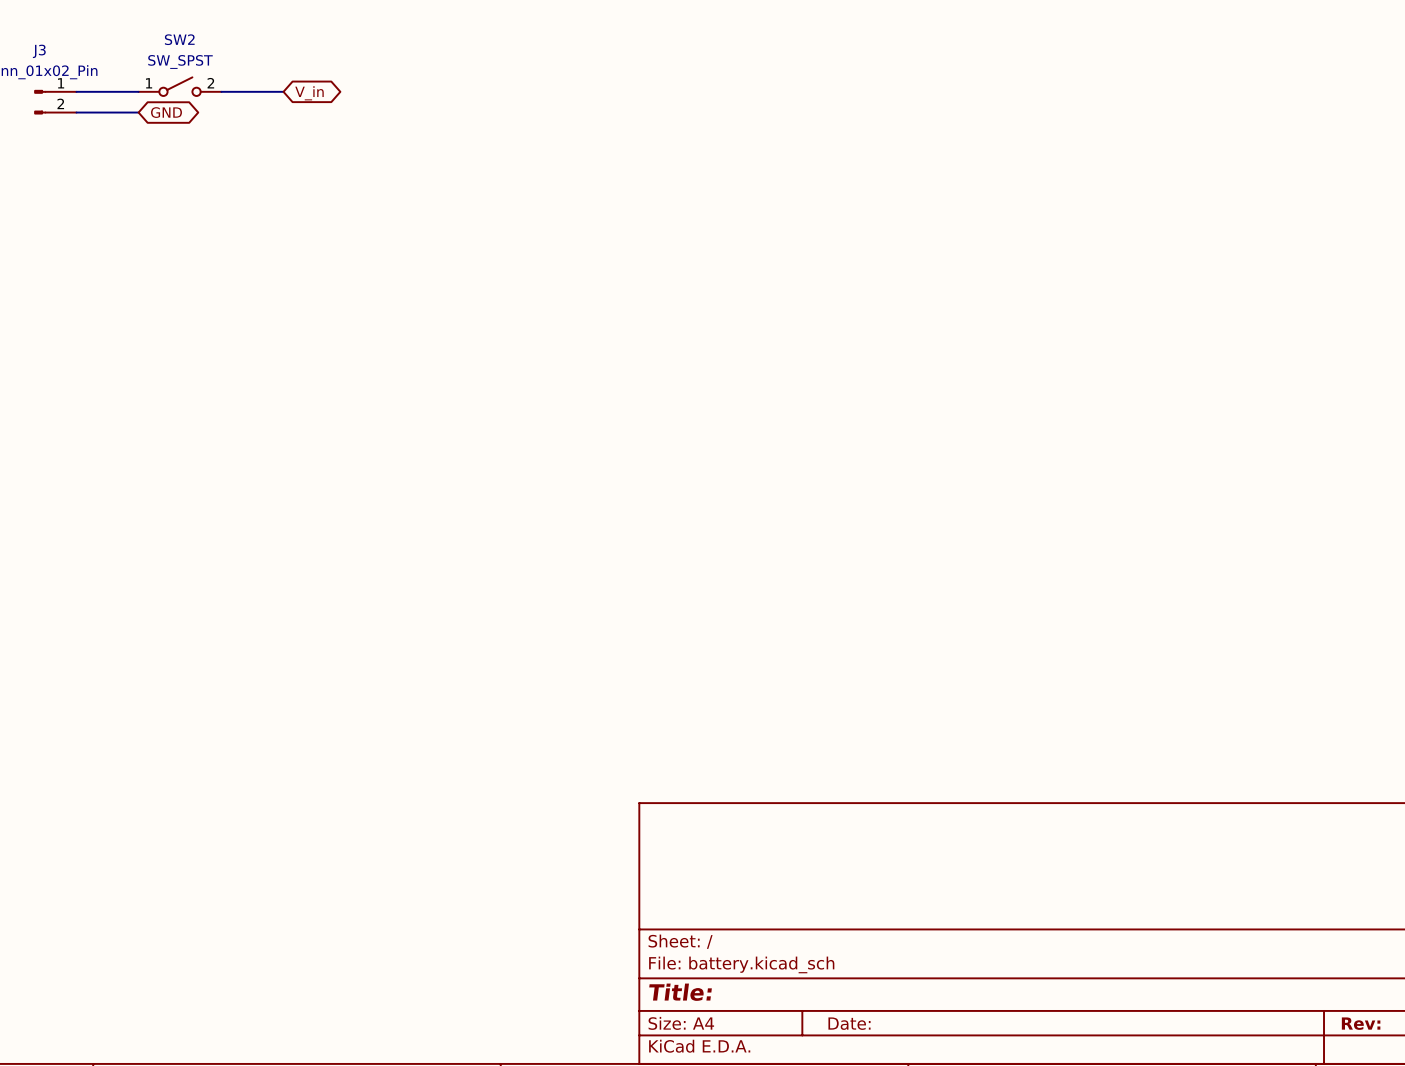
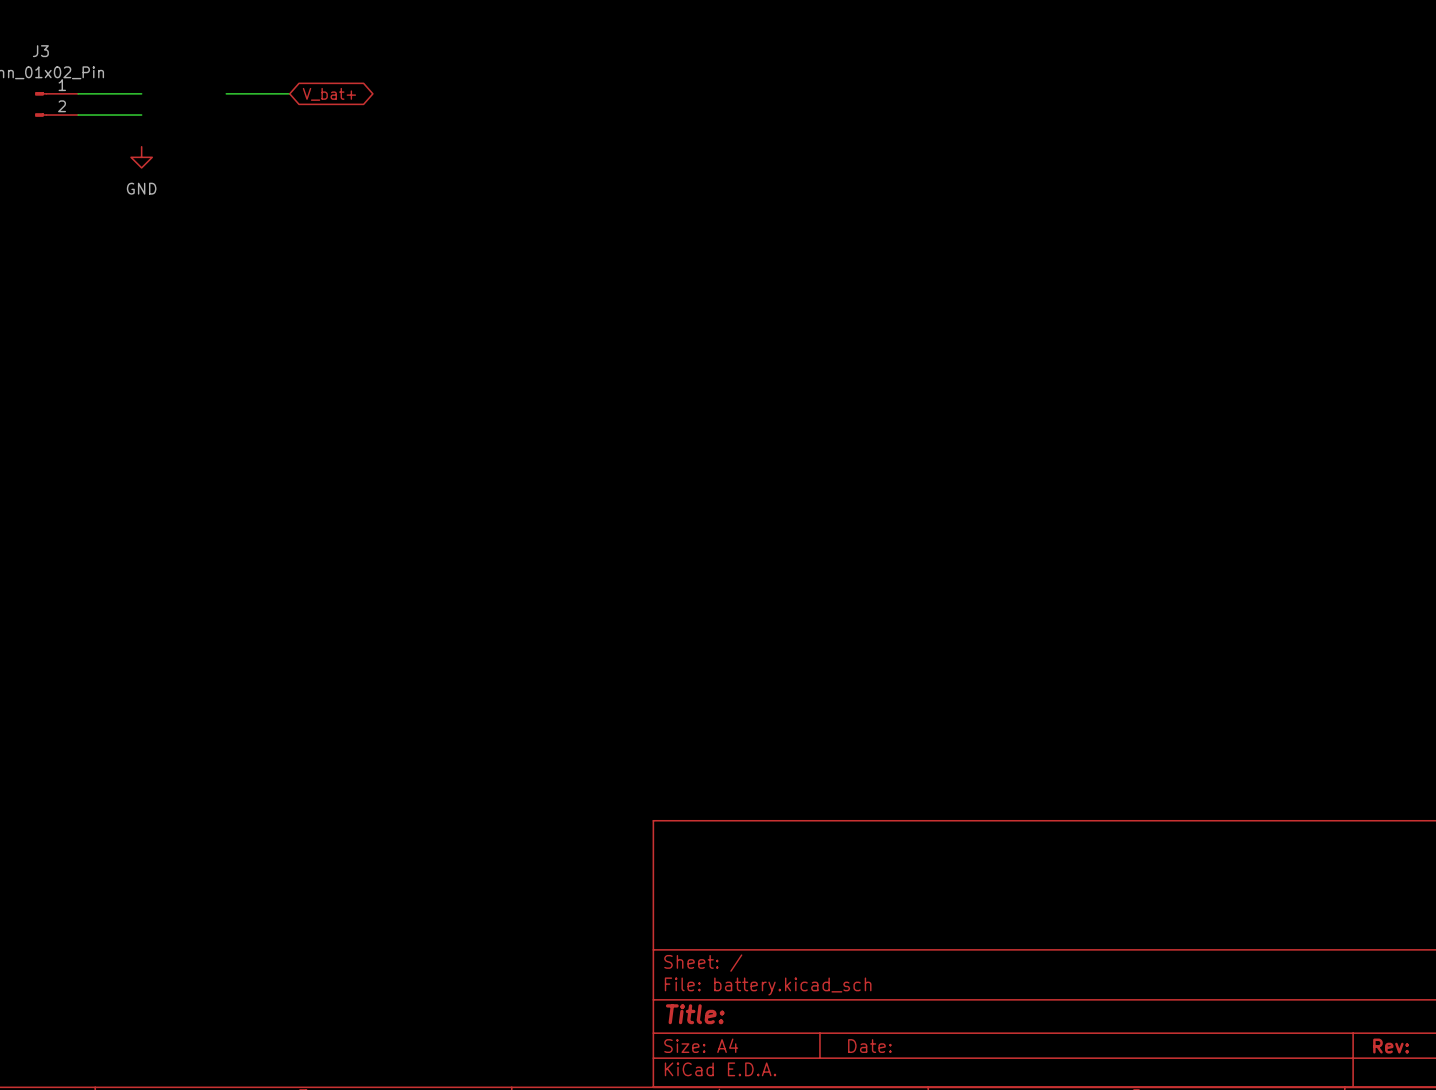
SW2: SW_SPST (180, 86) -> none
global label: V_in (309, 93) -> V_bat+ (329, 94)
global label: GND (166, 112) -> none
power symbol: none -> GND (141, 157)

